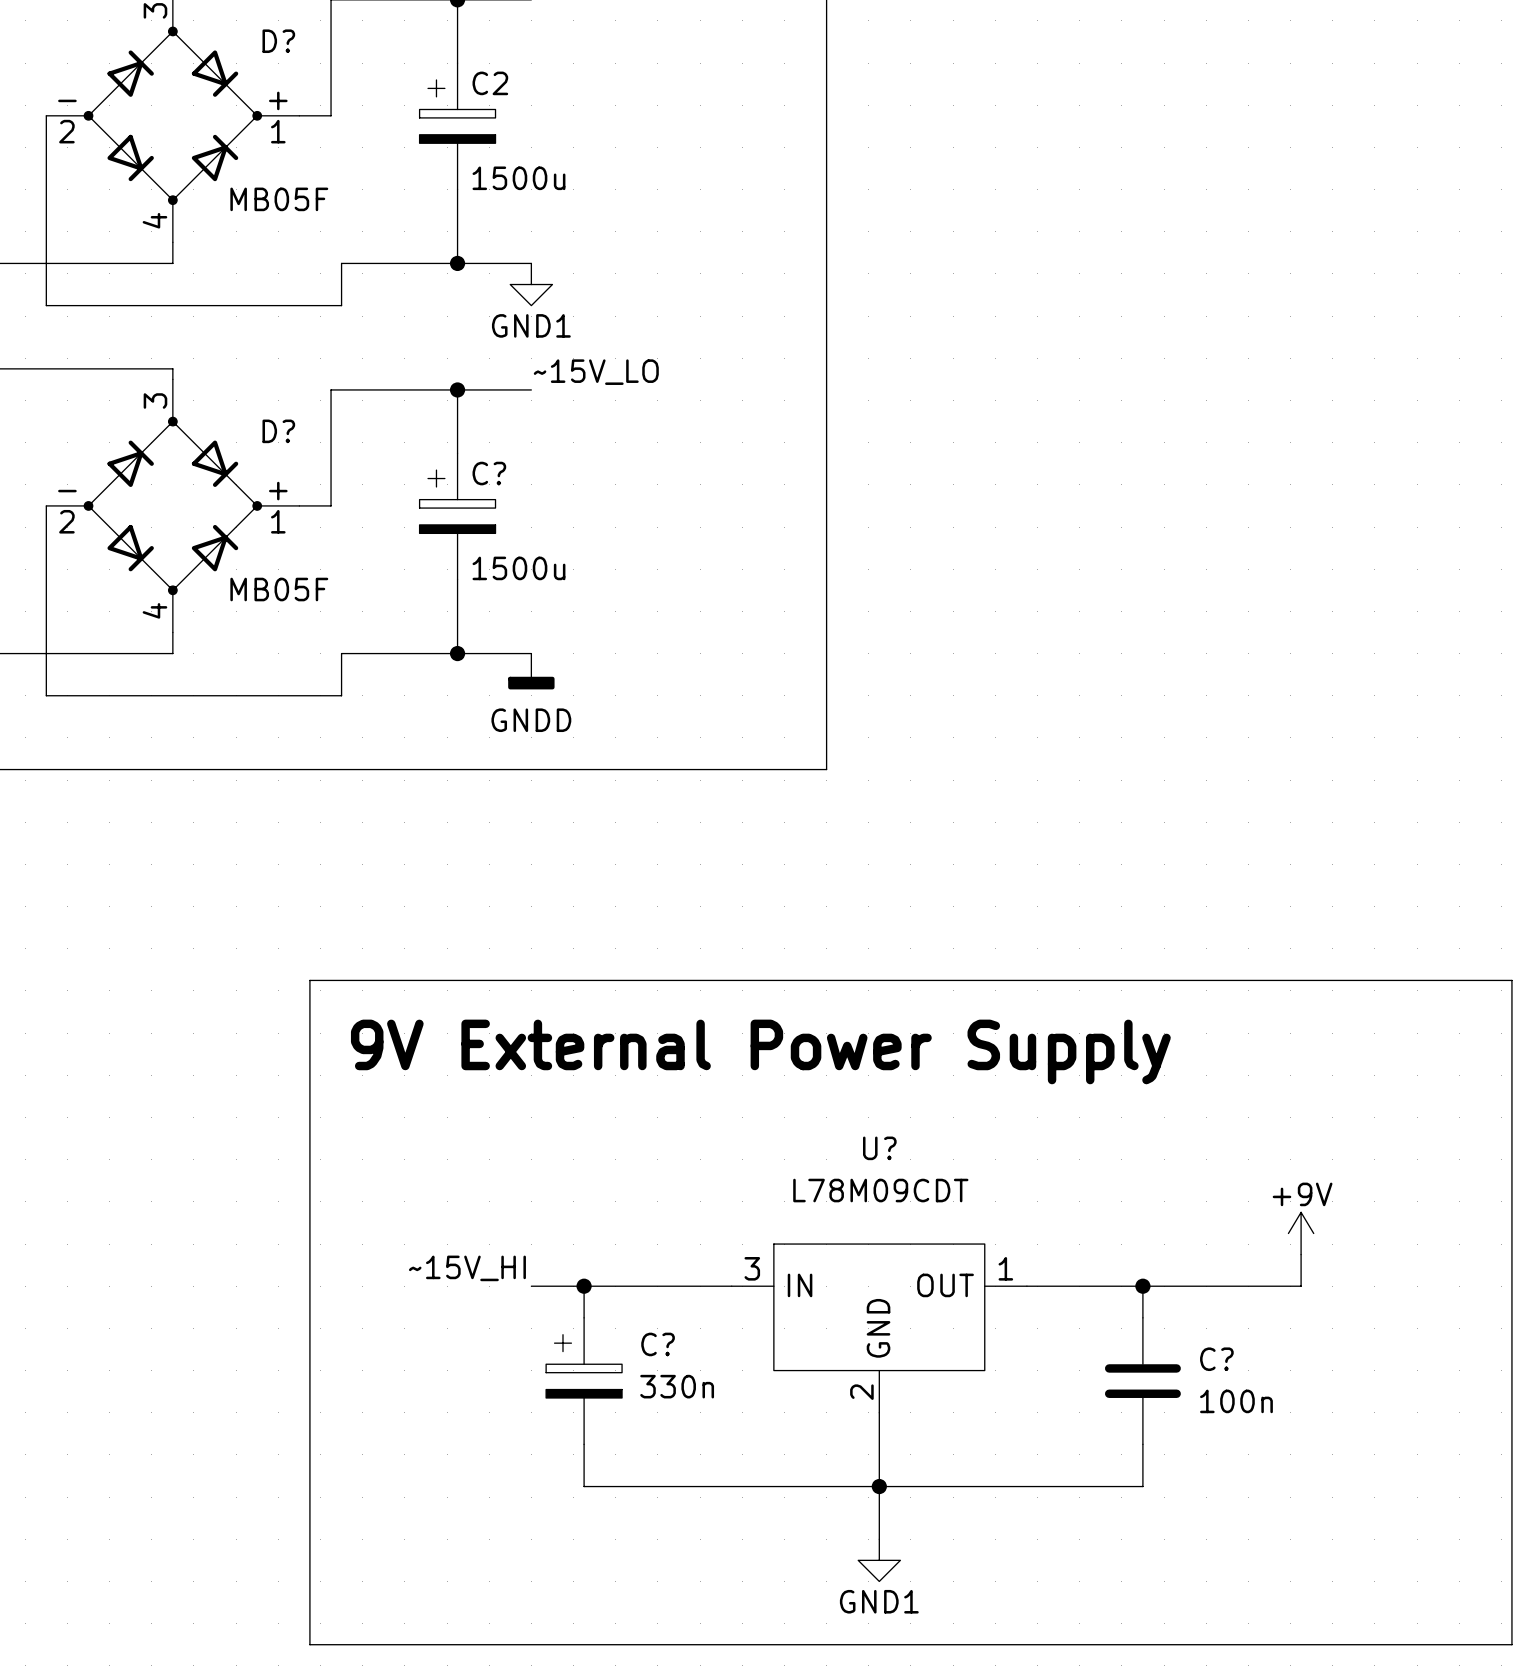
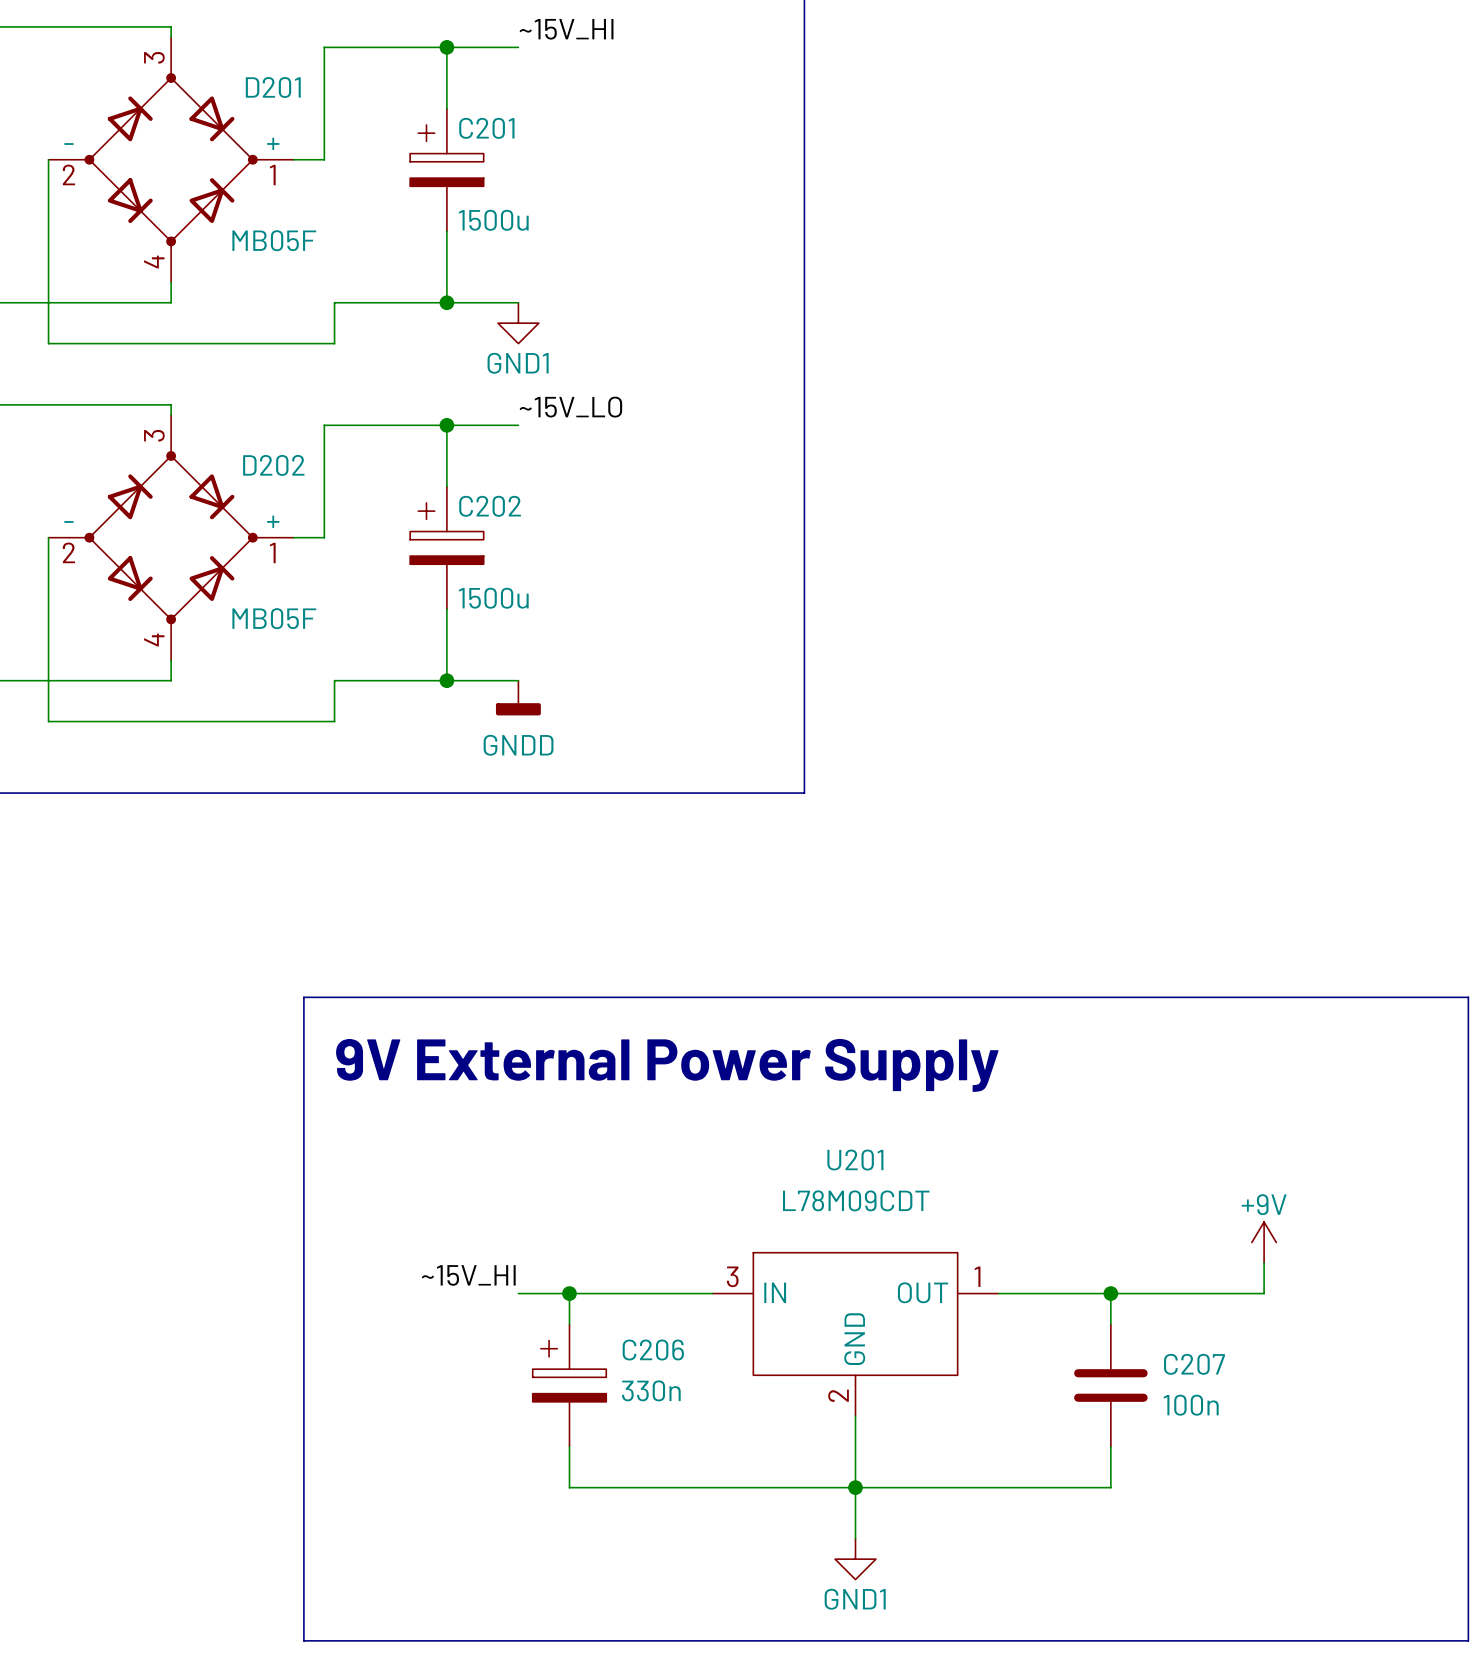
D? name: D? (278, 41) -> D201 (273, 87)
C2 name: C2 (490, 83) -> C201 (486, 128)
D? name: D? (278, 431) -> D202 (273, 465)
C? name: C? (489, 473) -> C202 (490, 506)
U? name: U? (879, 1148) -> U201 (855, 1160)
C? name: C? (658, 1344) -> C206 (653, 1350)
C? name: C? (1216, 1359) -> C207 (1194, 1364)

